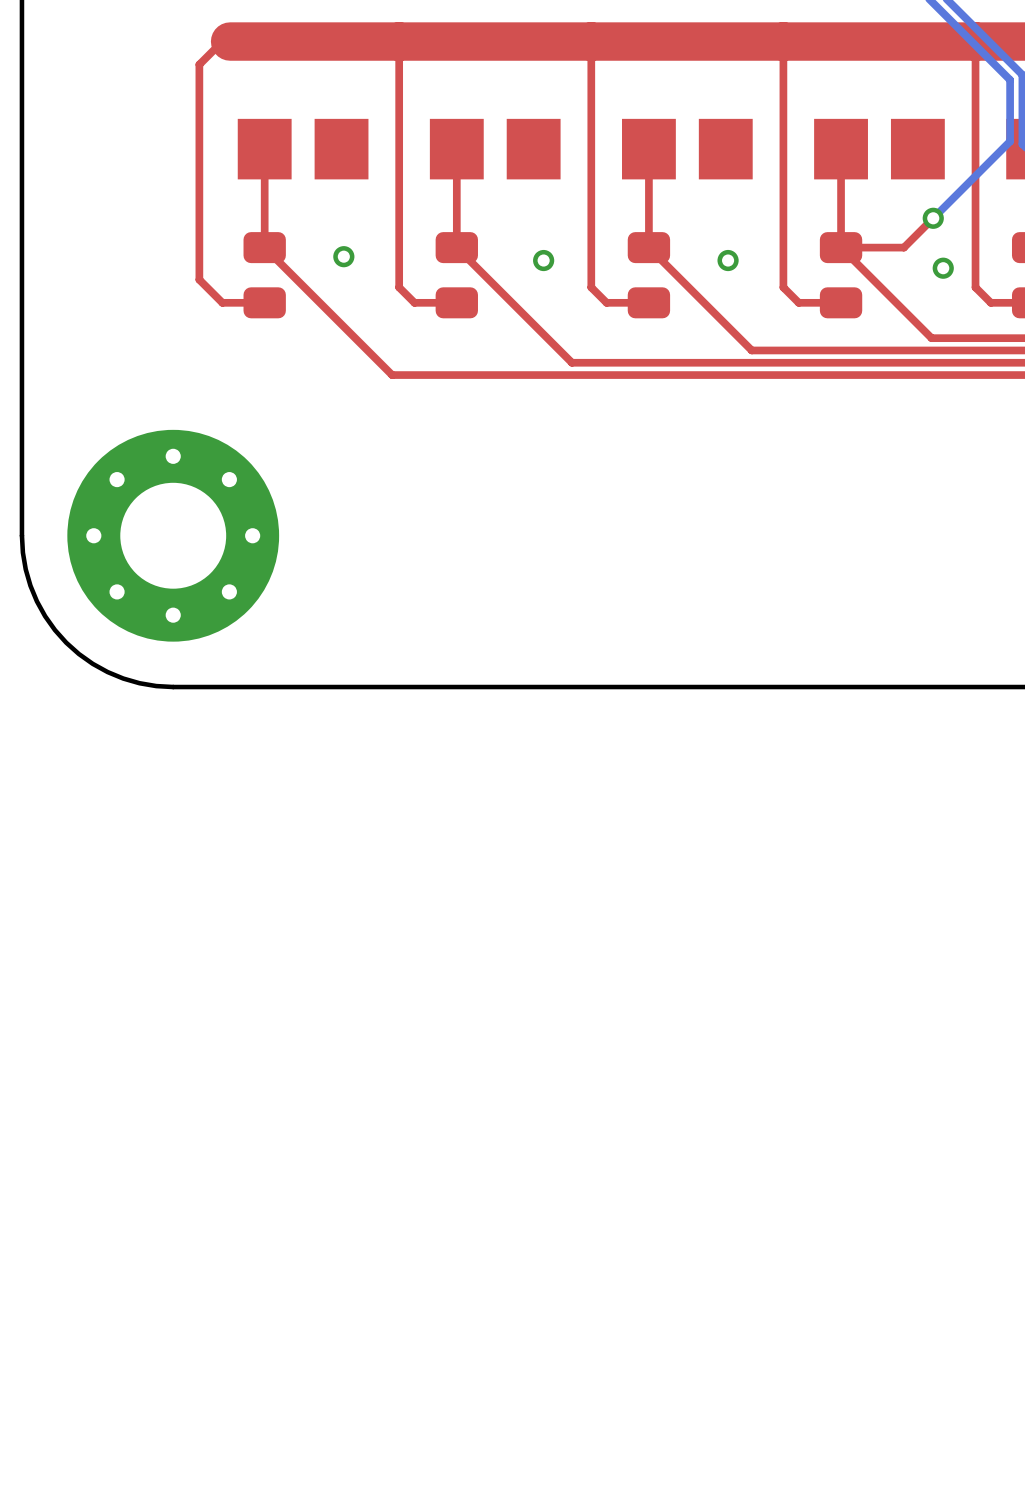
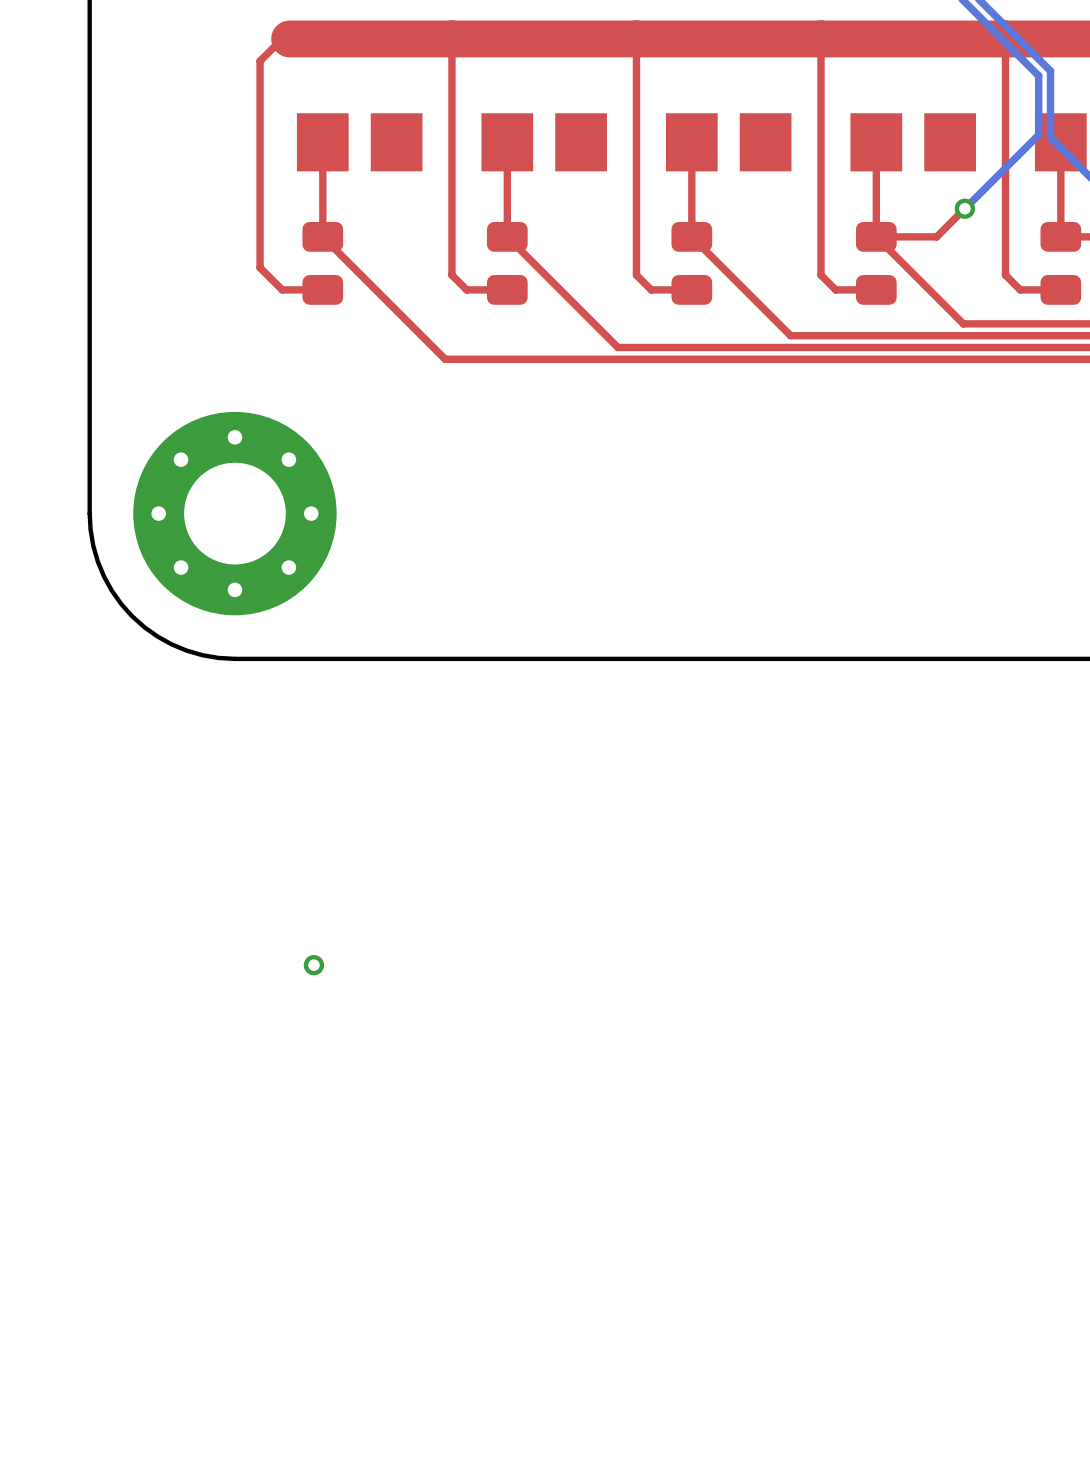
via: (343, 256) -> none
via: (543, 260) -> none
via: (728, 260) -> none
via: (943, 268) -> none
via: none -> (313, 965)

